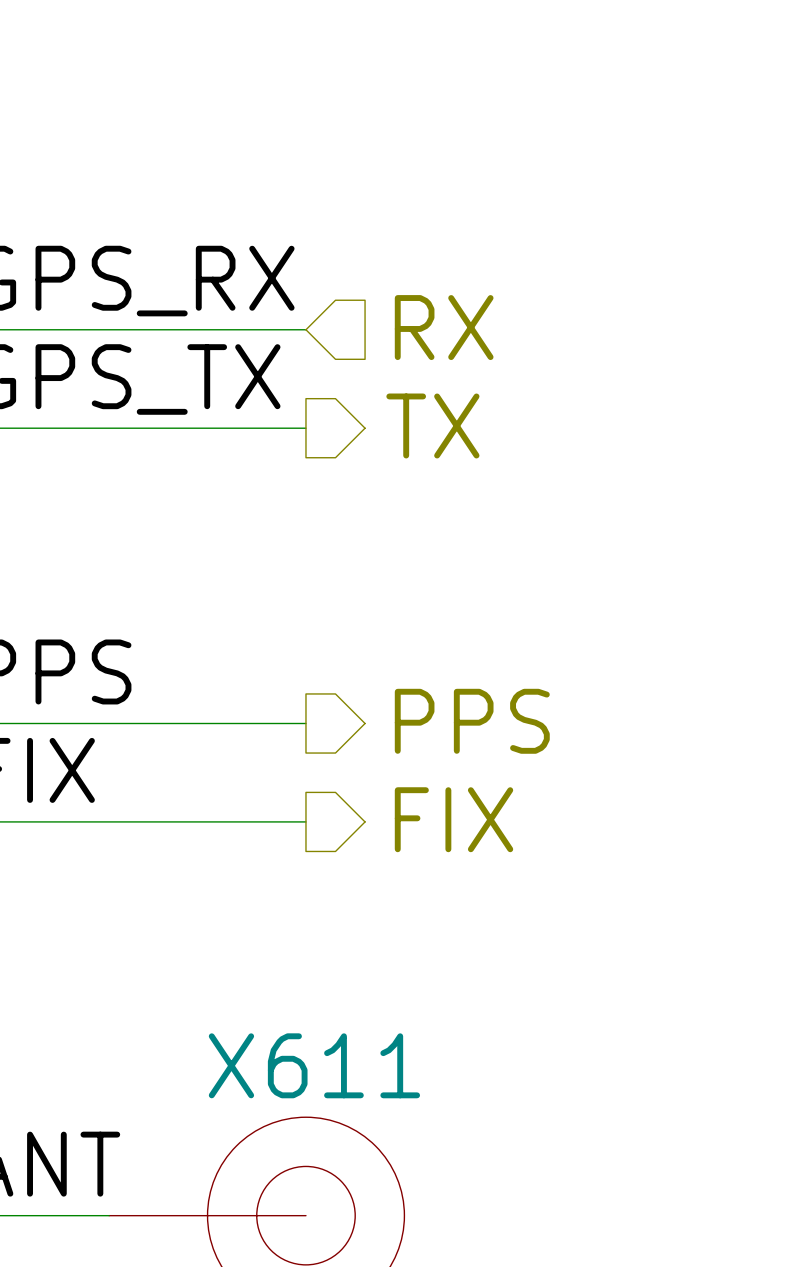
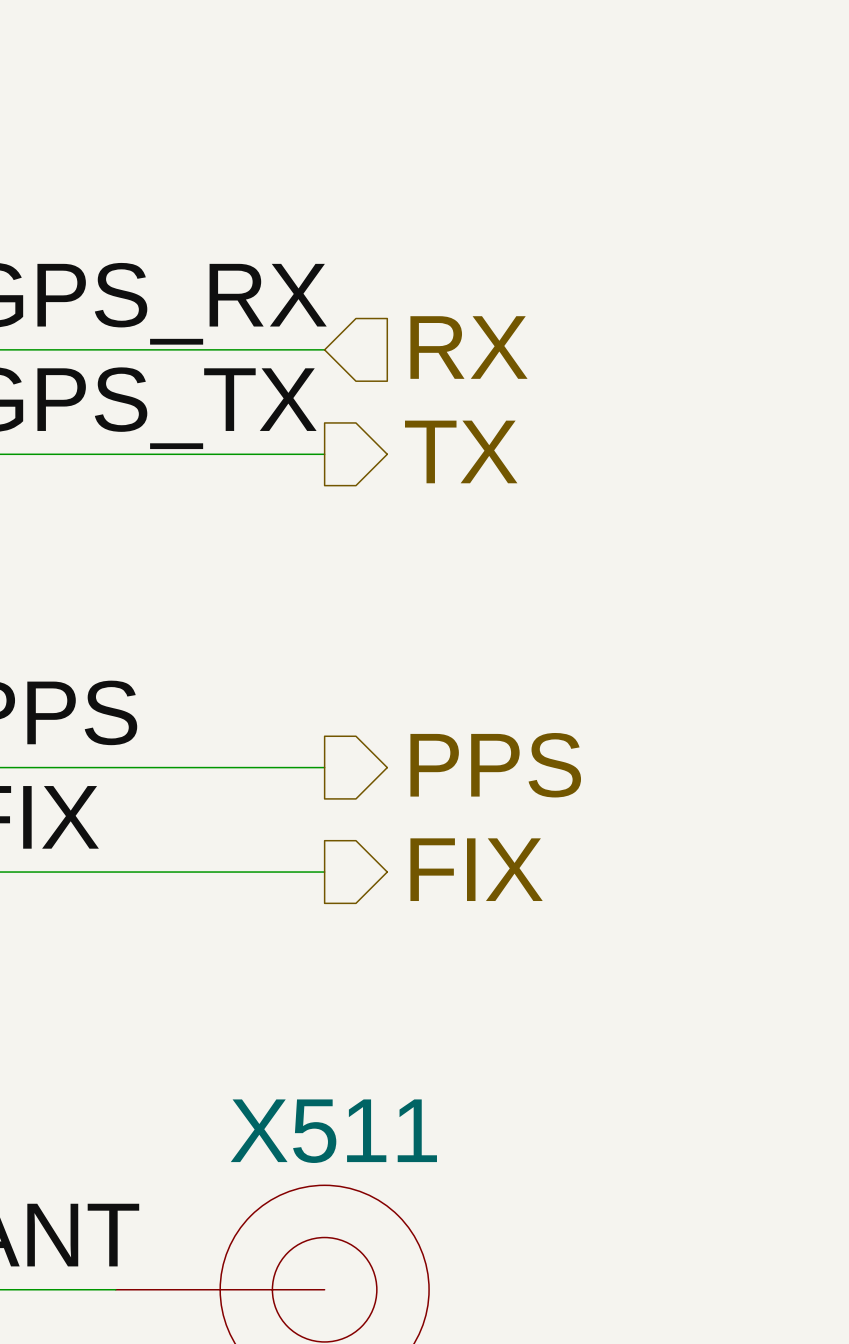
X611 name: X611 (314, 1065) -> X511 (333, 1131)

